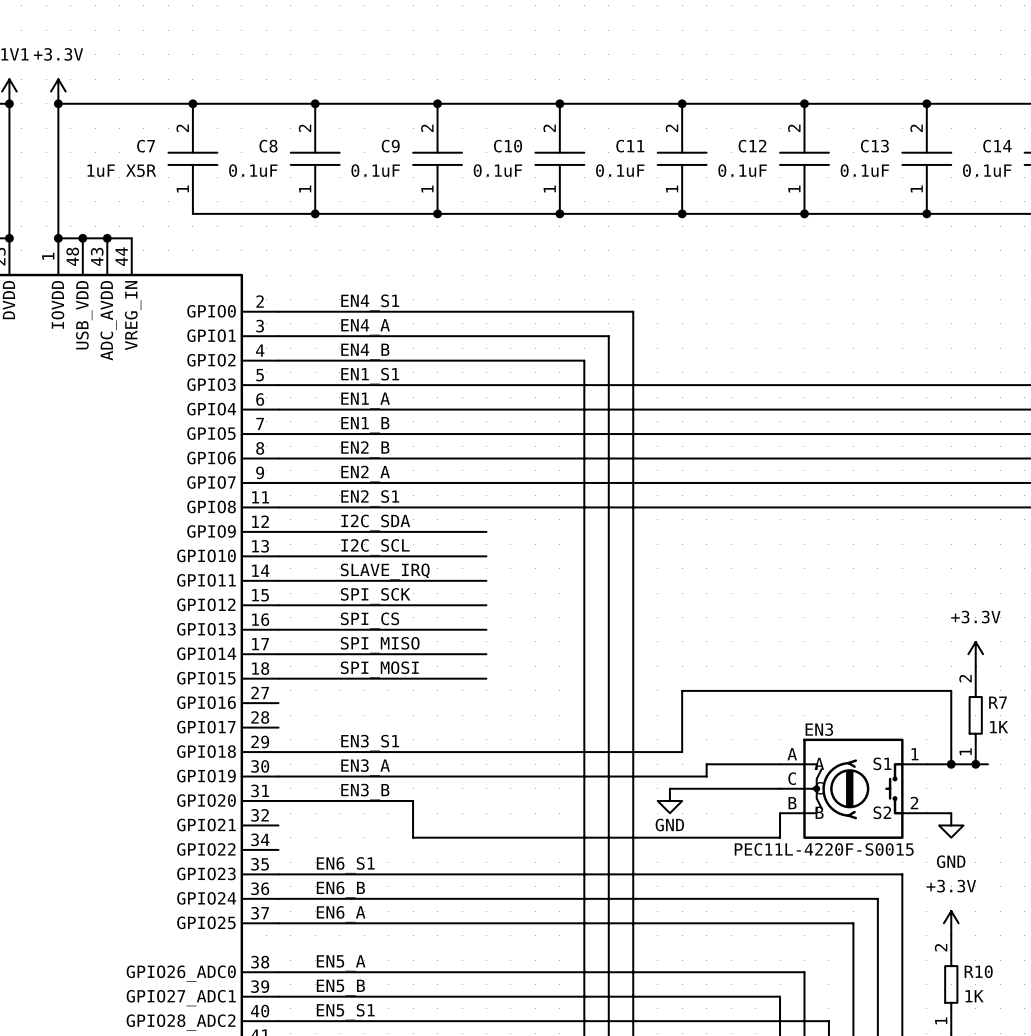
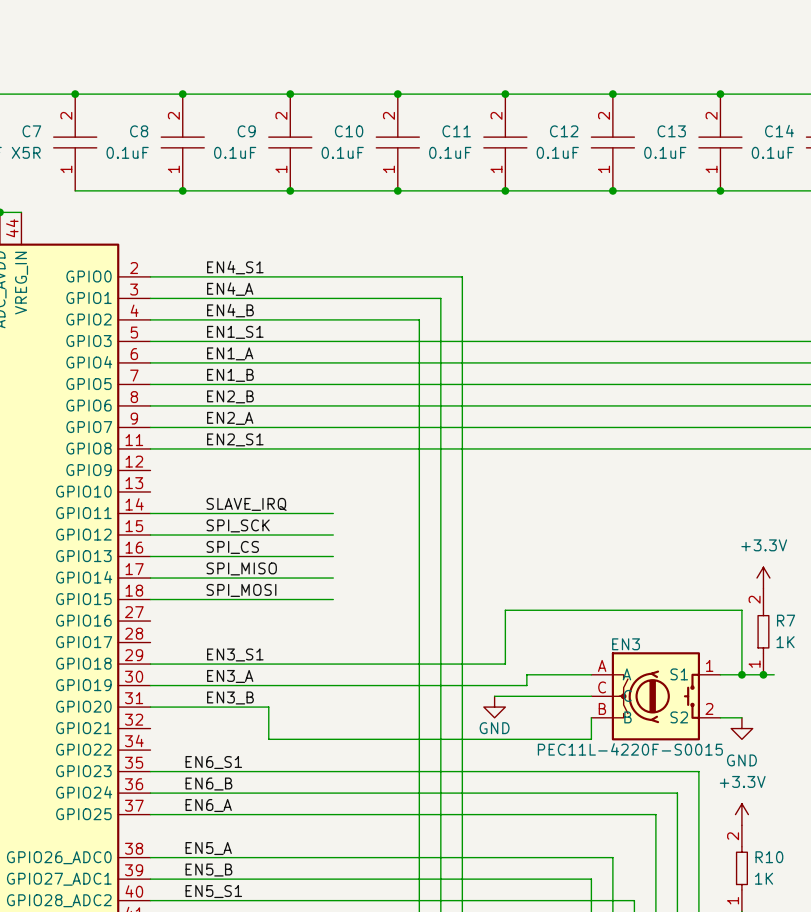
label: I2C_SDA (375, 522) -> none
wire: (278, 531) (486, 531) -> none
label: I2C_SCL (375, 547) -> none
wire: (278, 556) (486, 556) -> none

